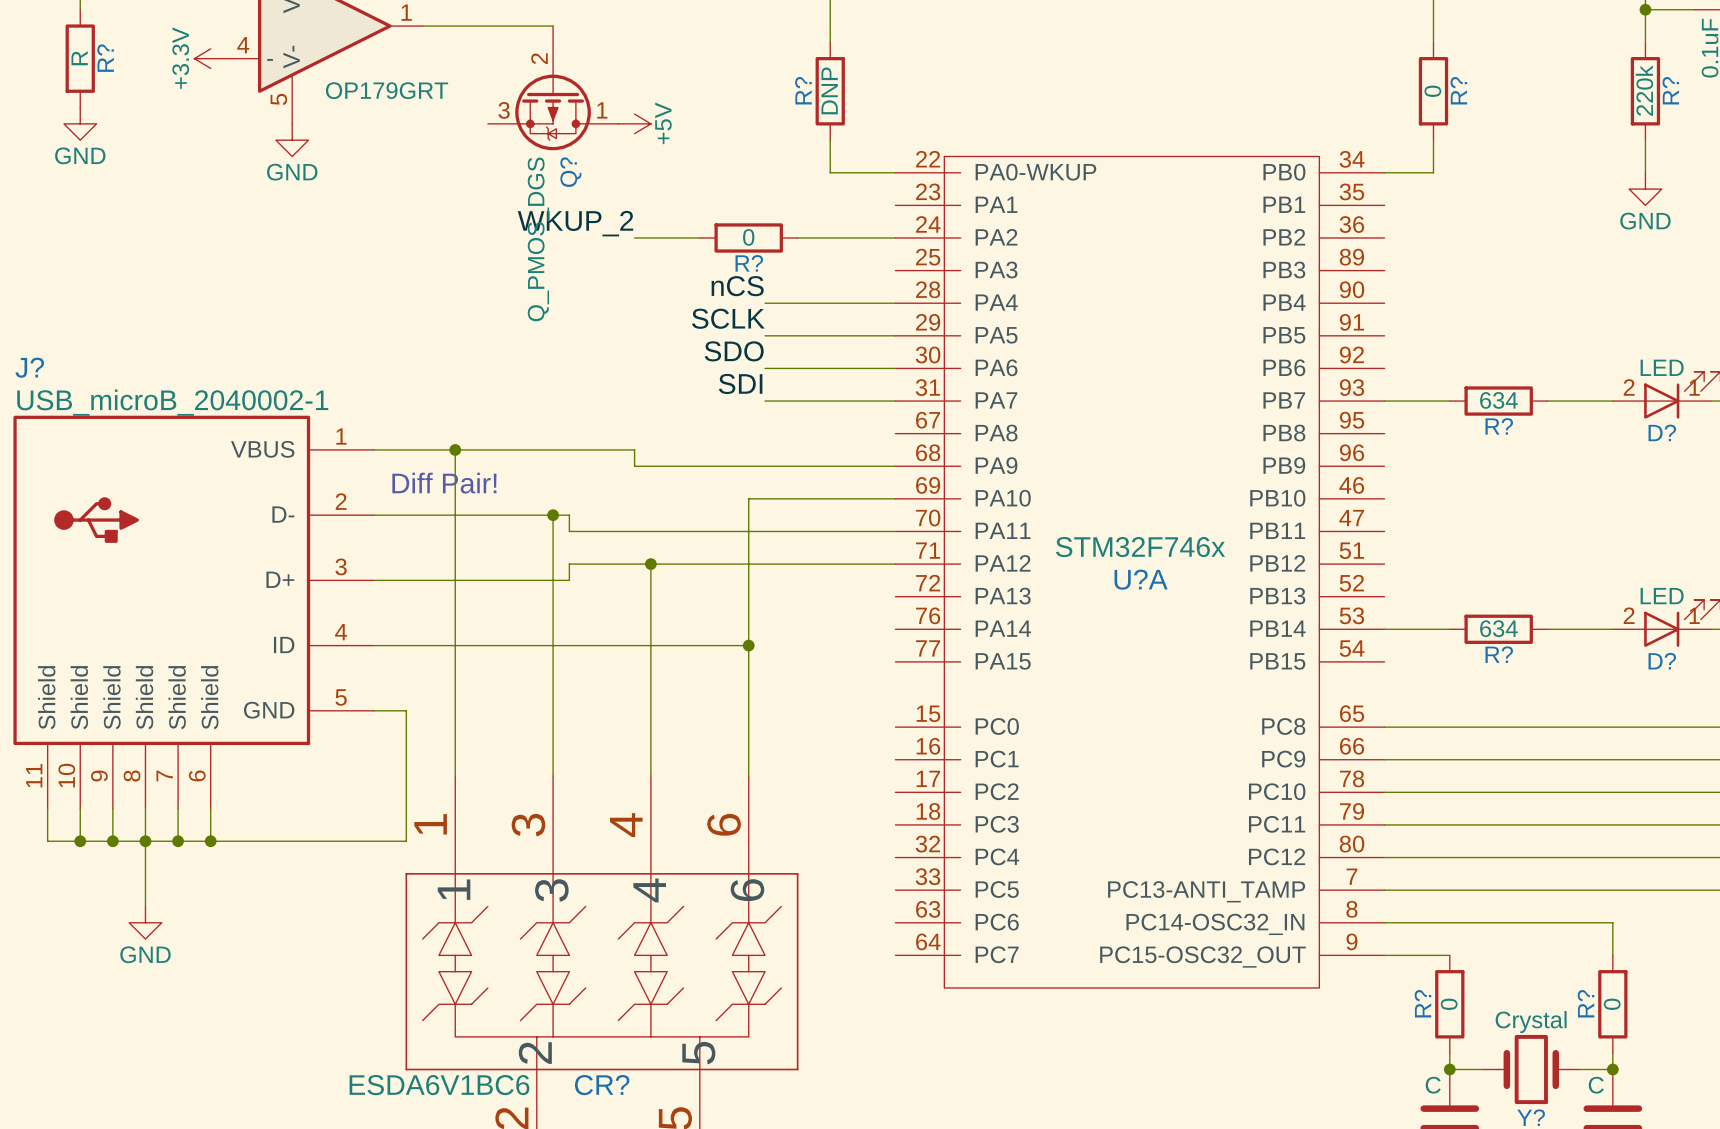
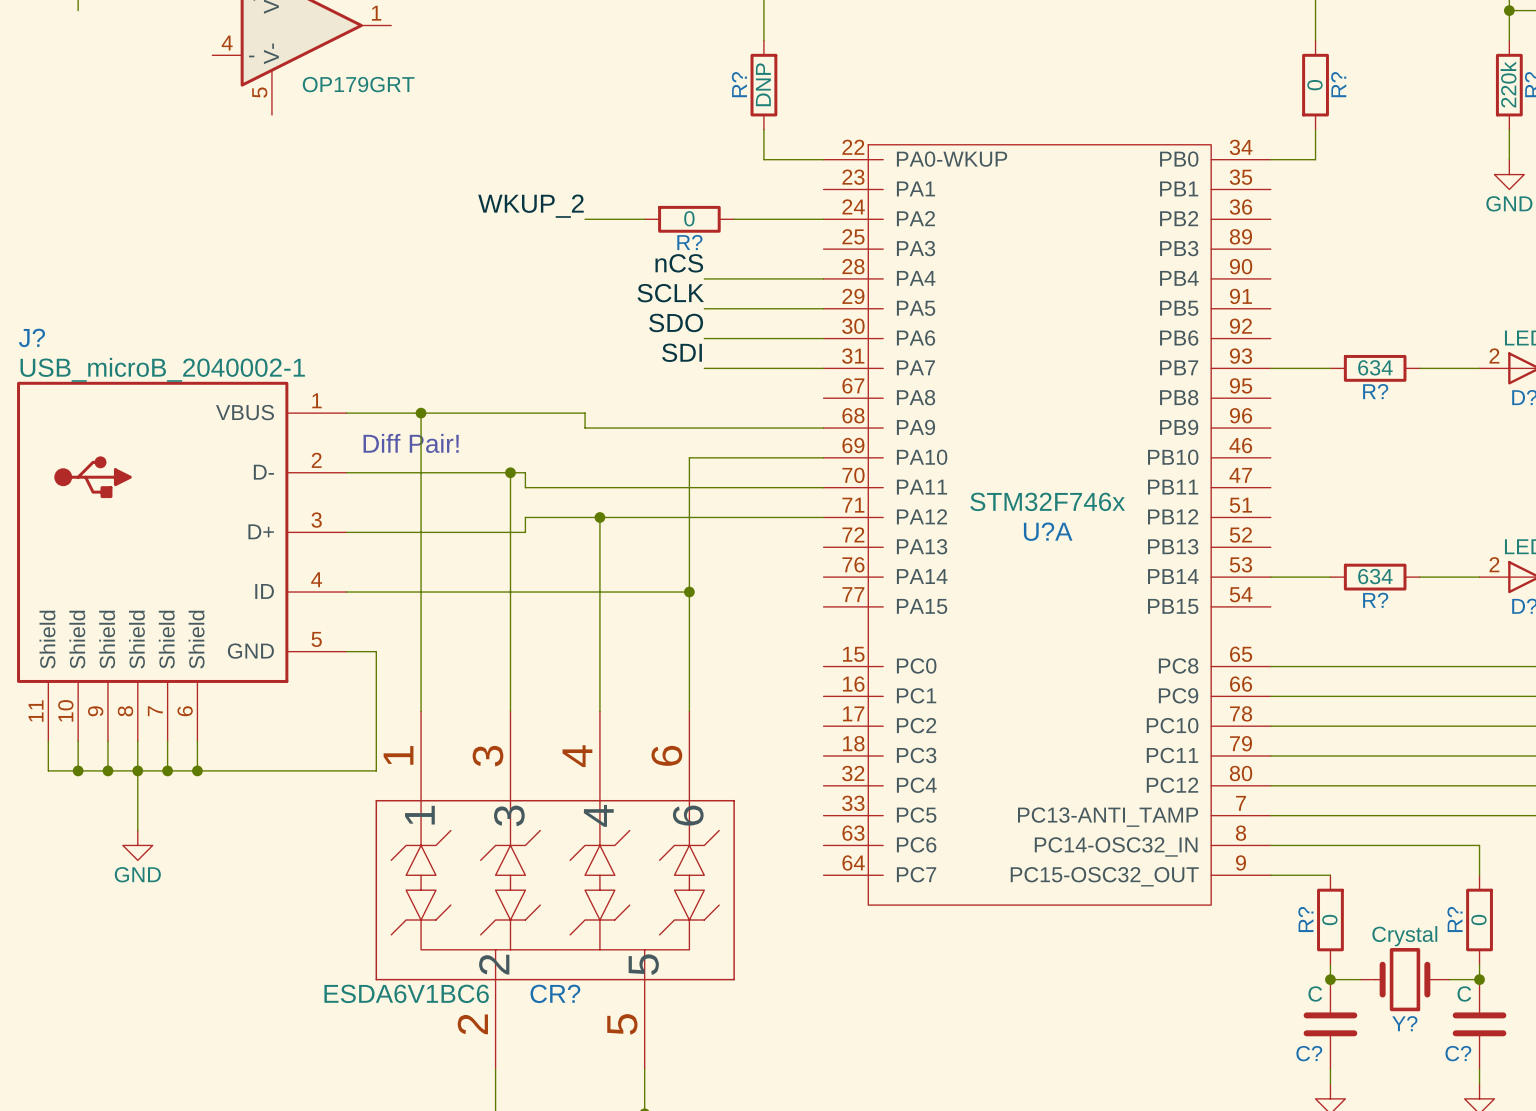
wire: (422, 26) (553, 26) -> none
R?: R (80, 58) -> none
power symbol: +3.3V (210, 58) -> none
Q?: Q_PMOS_DGS (553, 88) -> none
power symbol: GND (80, 123) -> none
power symbol: +5V (634, 123) -> none
power symbol: GND (292, 140) -> none

